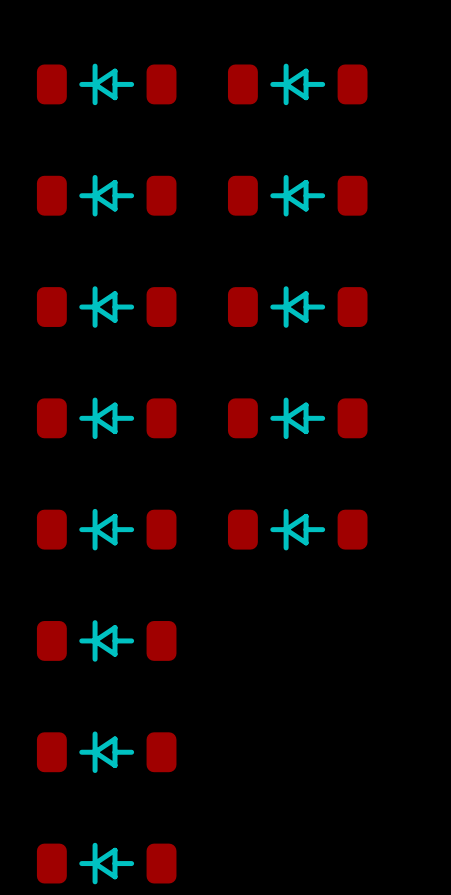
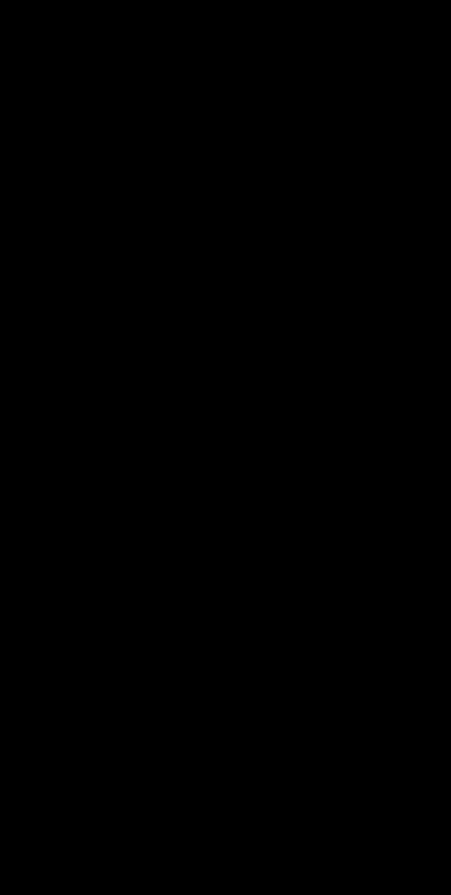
part: (106, 84) -> none
part: (297, 84) -> none
part: (106, 195) -> none
part: (297, 195) -> none
part: (106, 307) -> none
part: (297, 307) -> none
part: (106, 418) -> none
part: (297, 418) -> none
part: (106, 529) -> none
part: (297, 529) -> none
part: (106, 640) -> none
part: (106, 752) -> none
part: (106, 863) -> none

